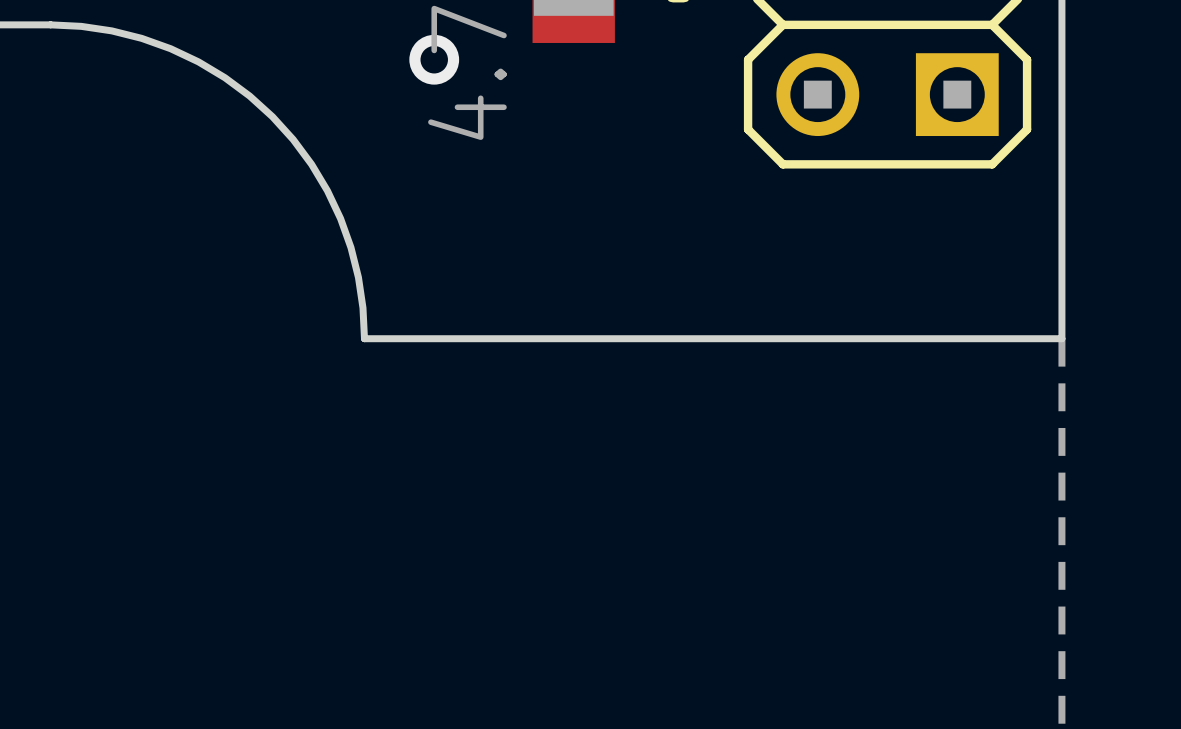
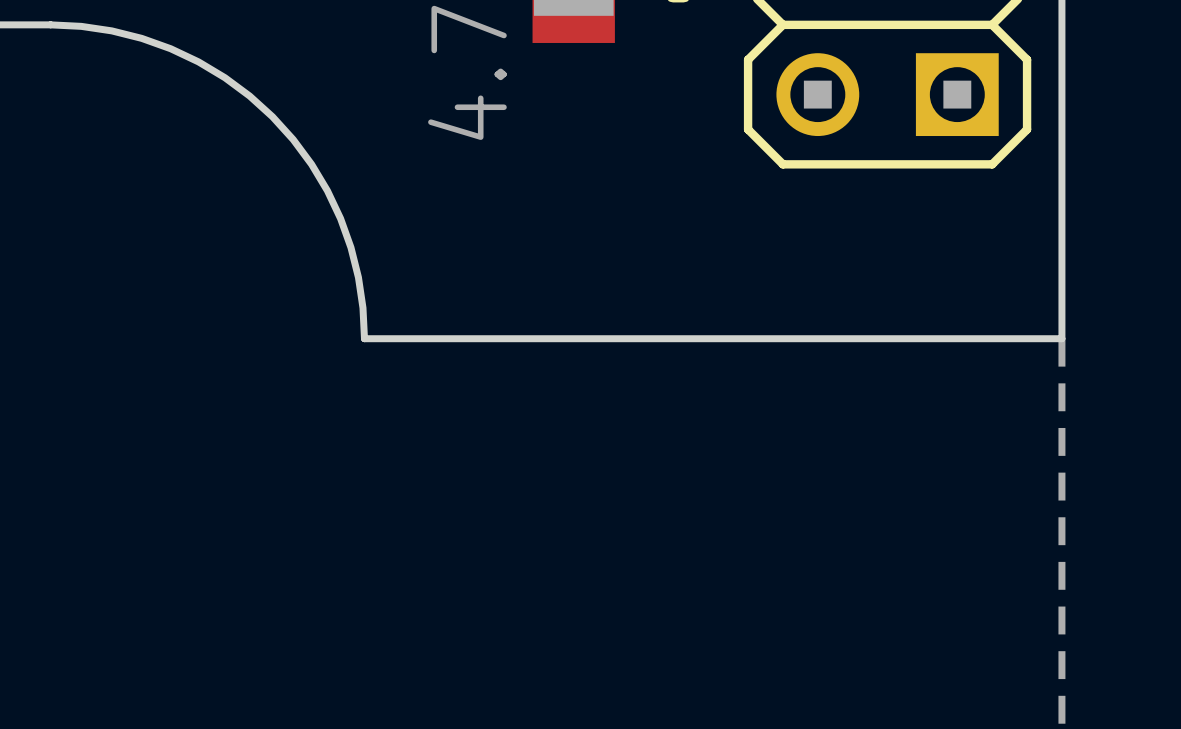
via: (434, 59) -> none

